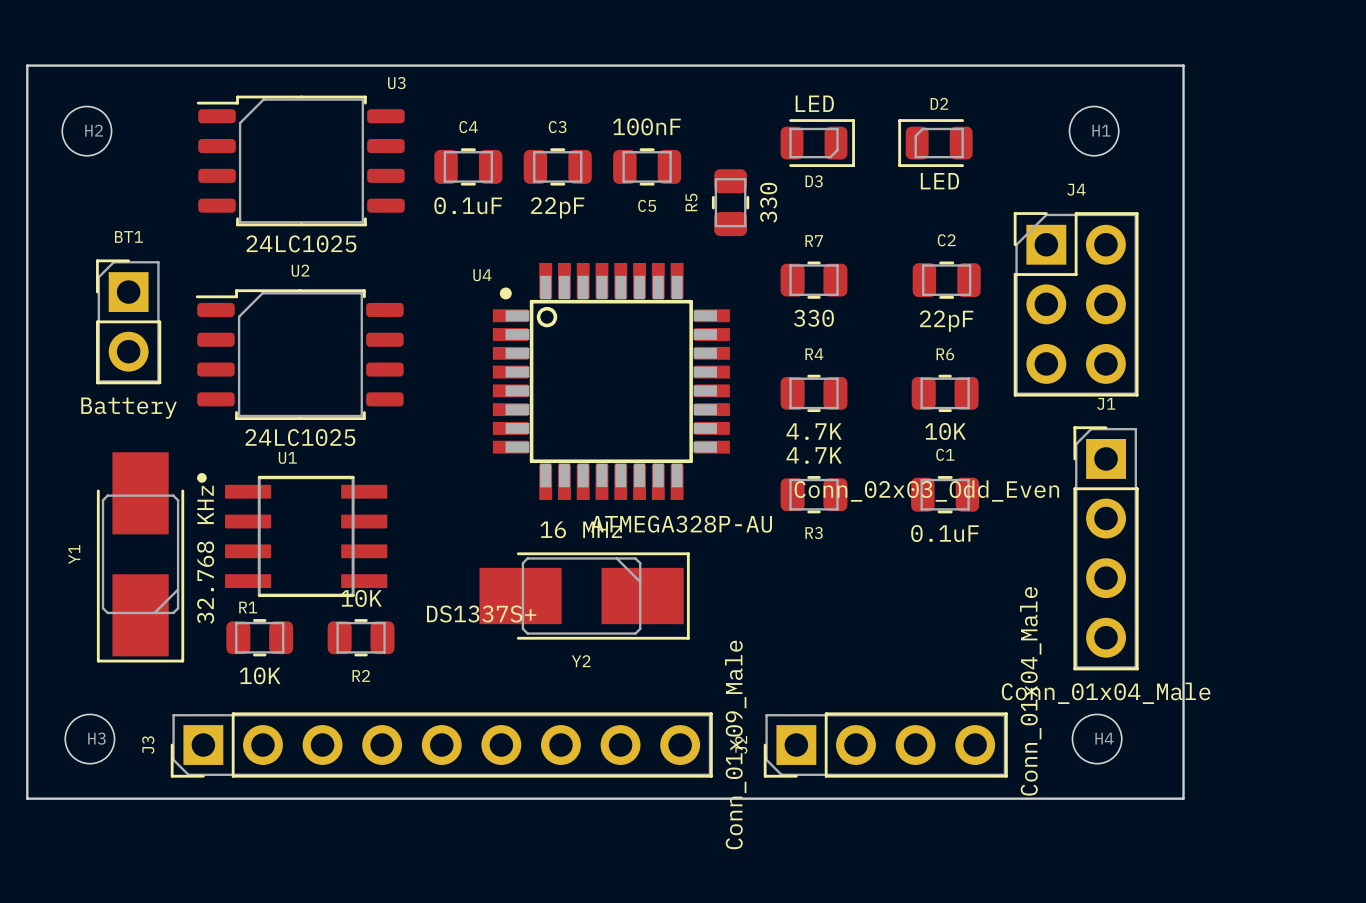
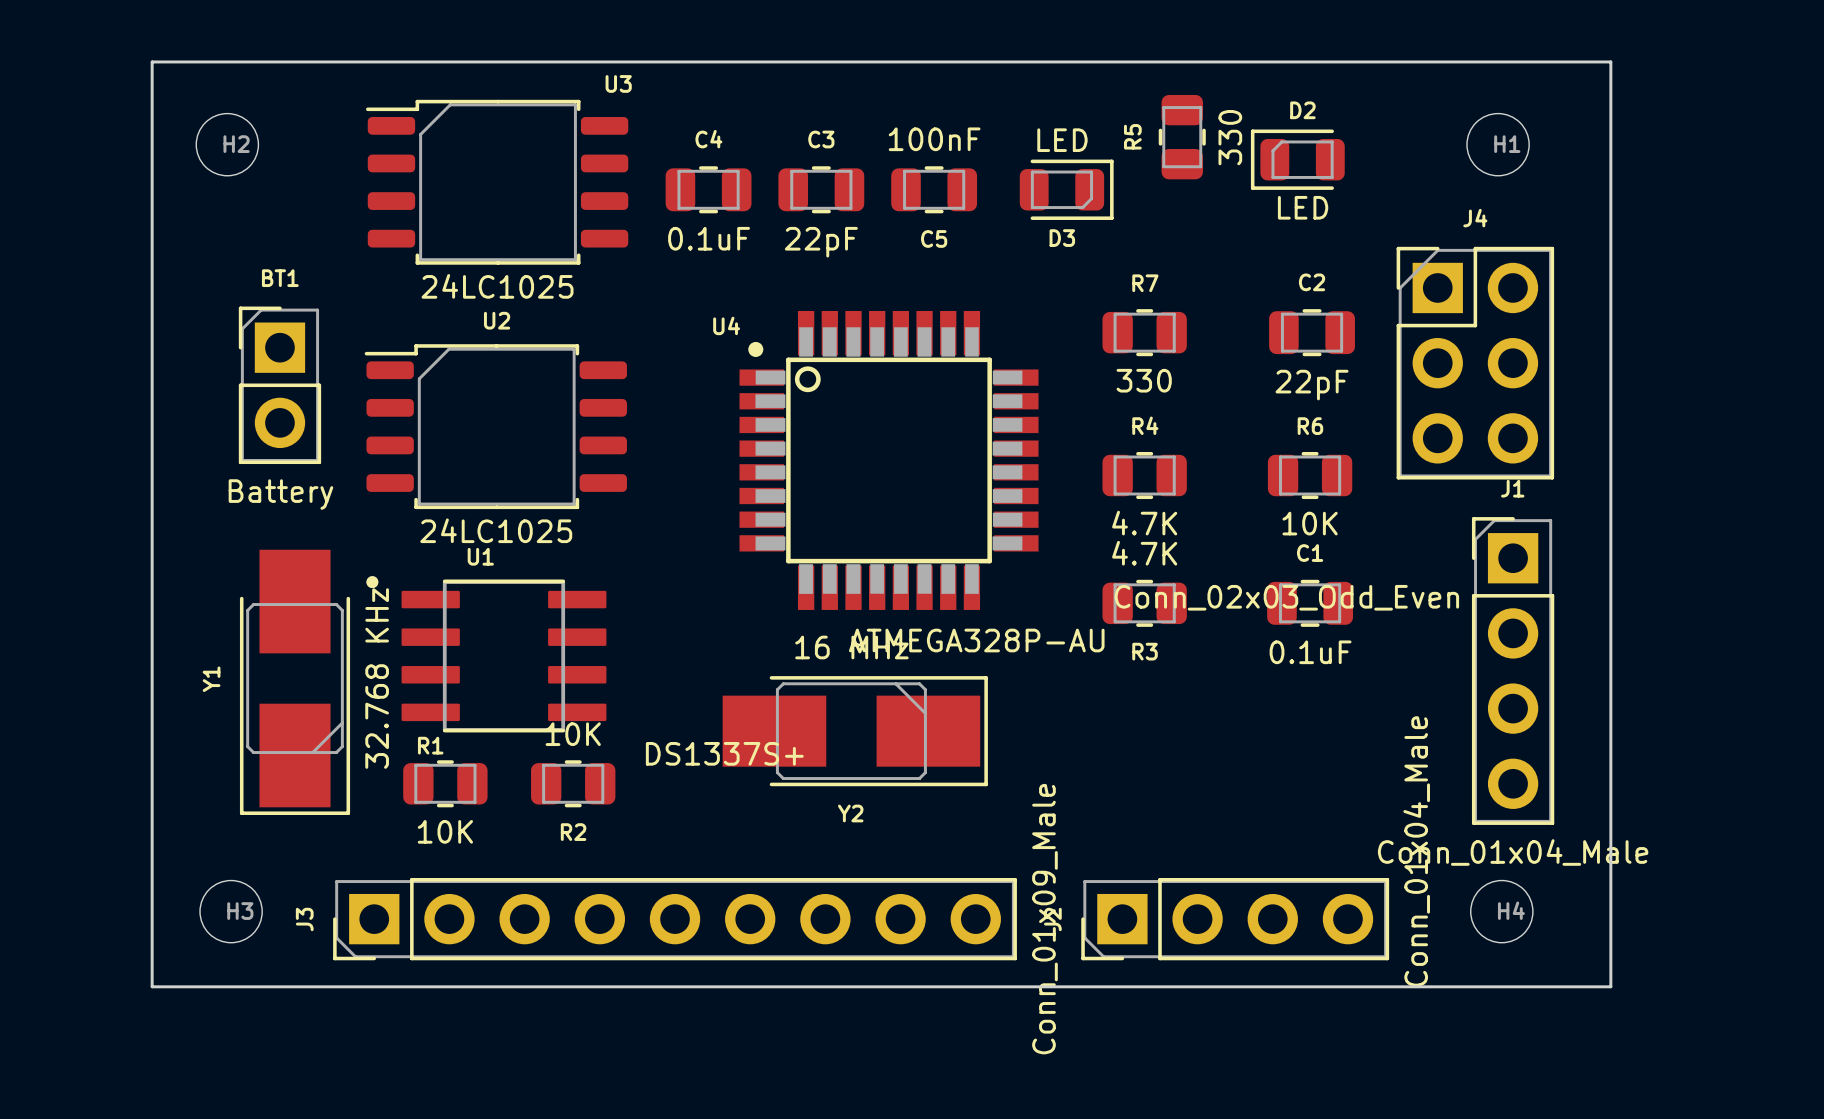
D3 position: (817, 143) -> (1066, 189)
R5 position: (730, 202) -> (1182, 137)

